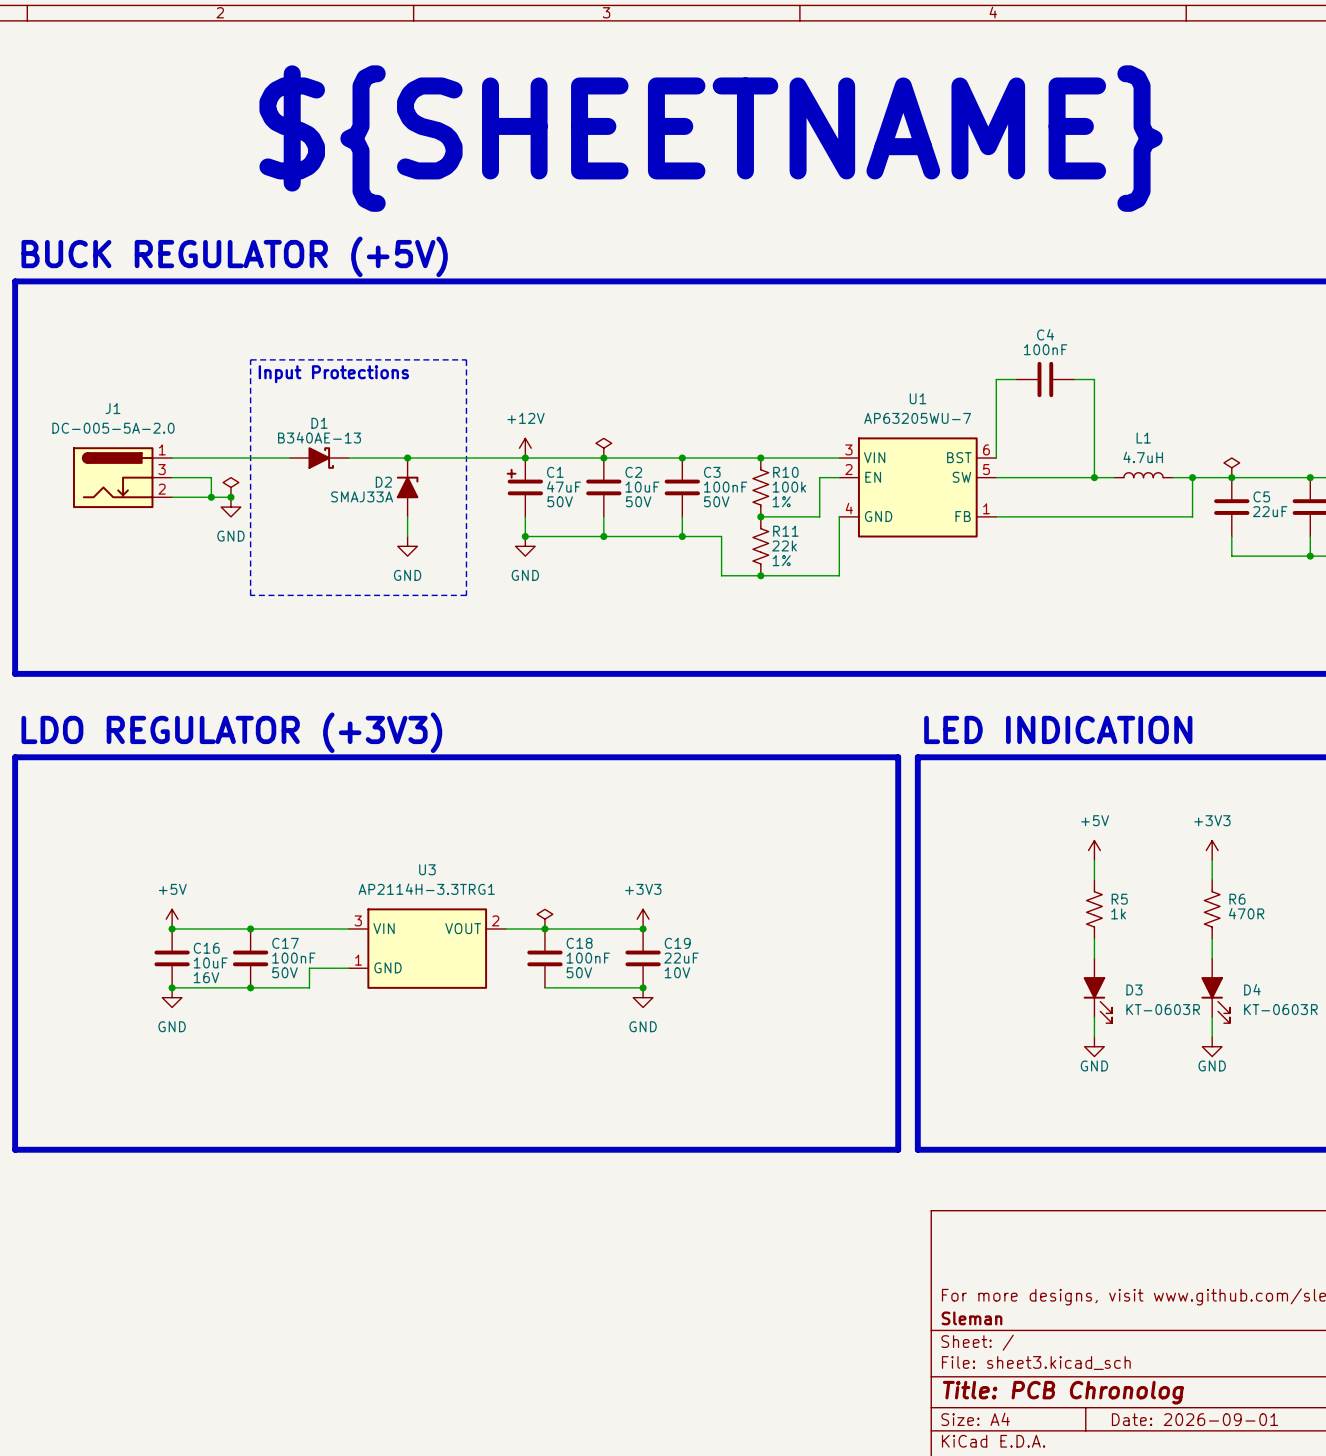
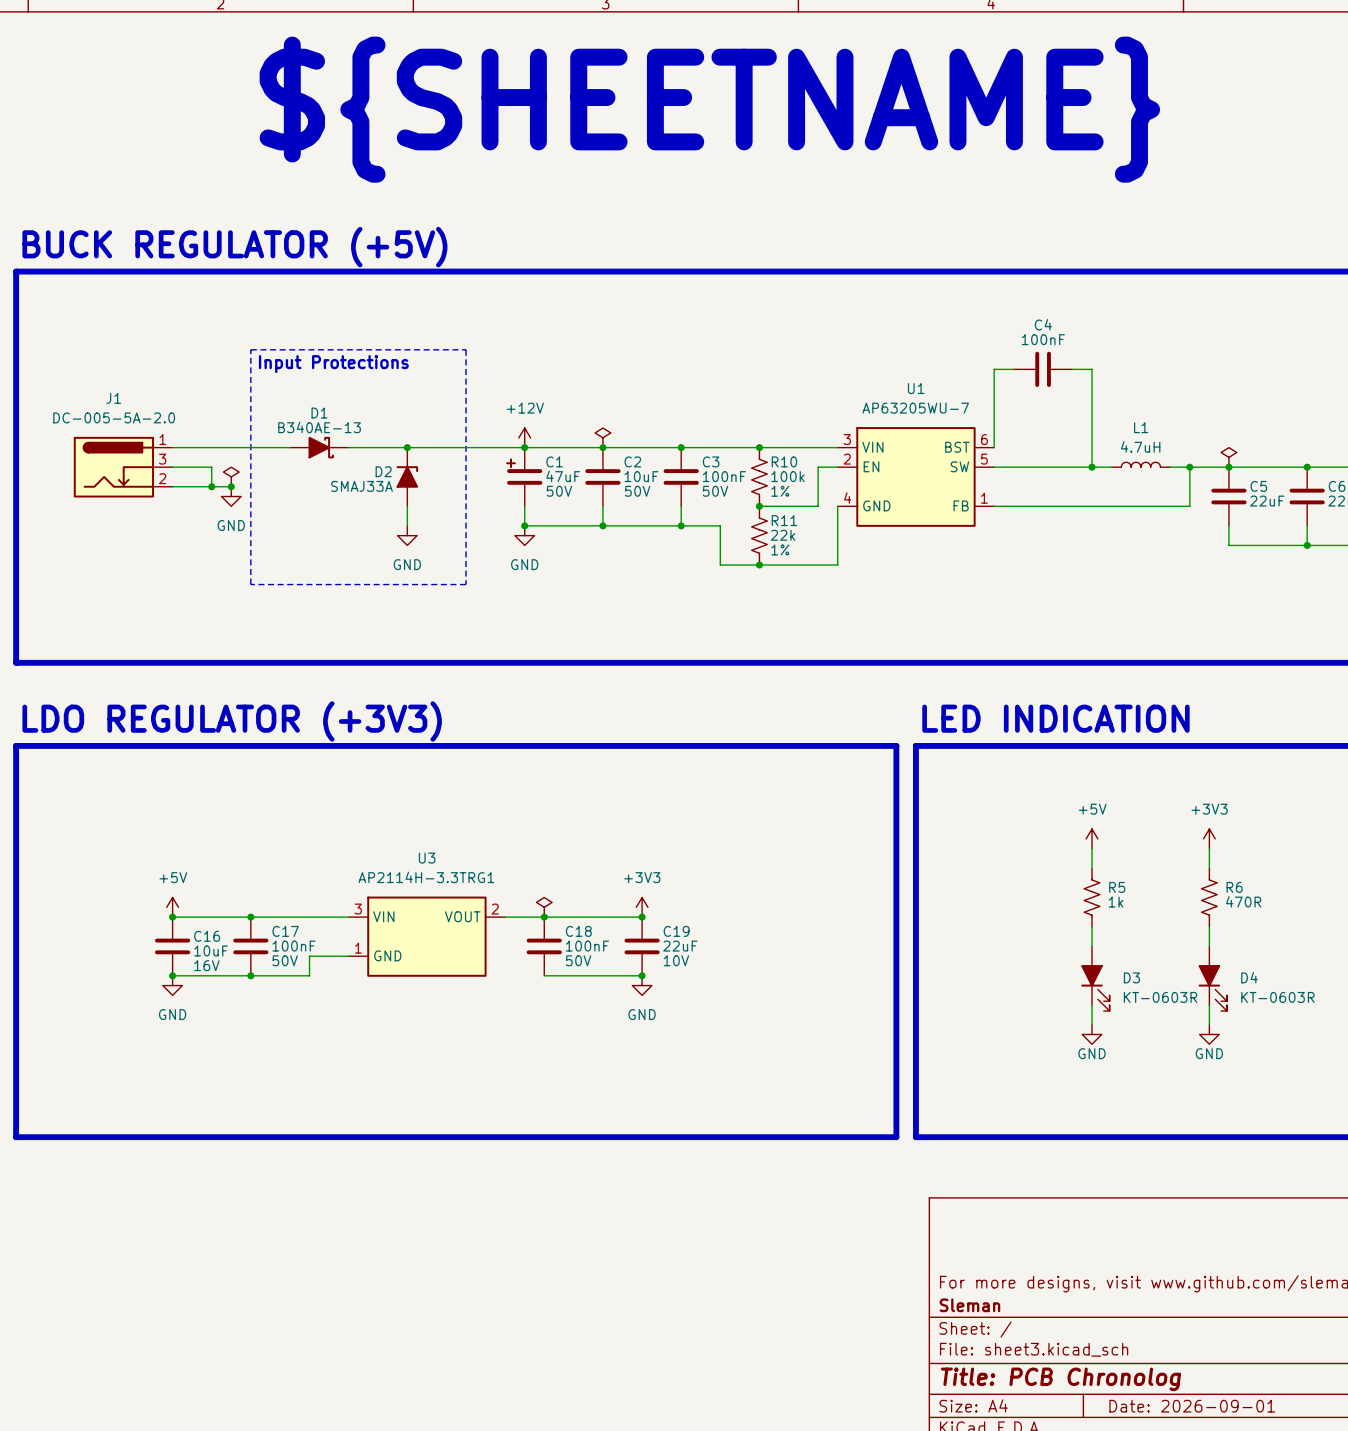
text position: ${SHEETNAME} (711, 138) -> ${SHEETNAME} (709, 109)

